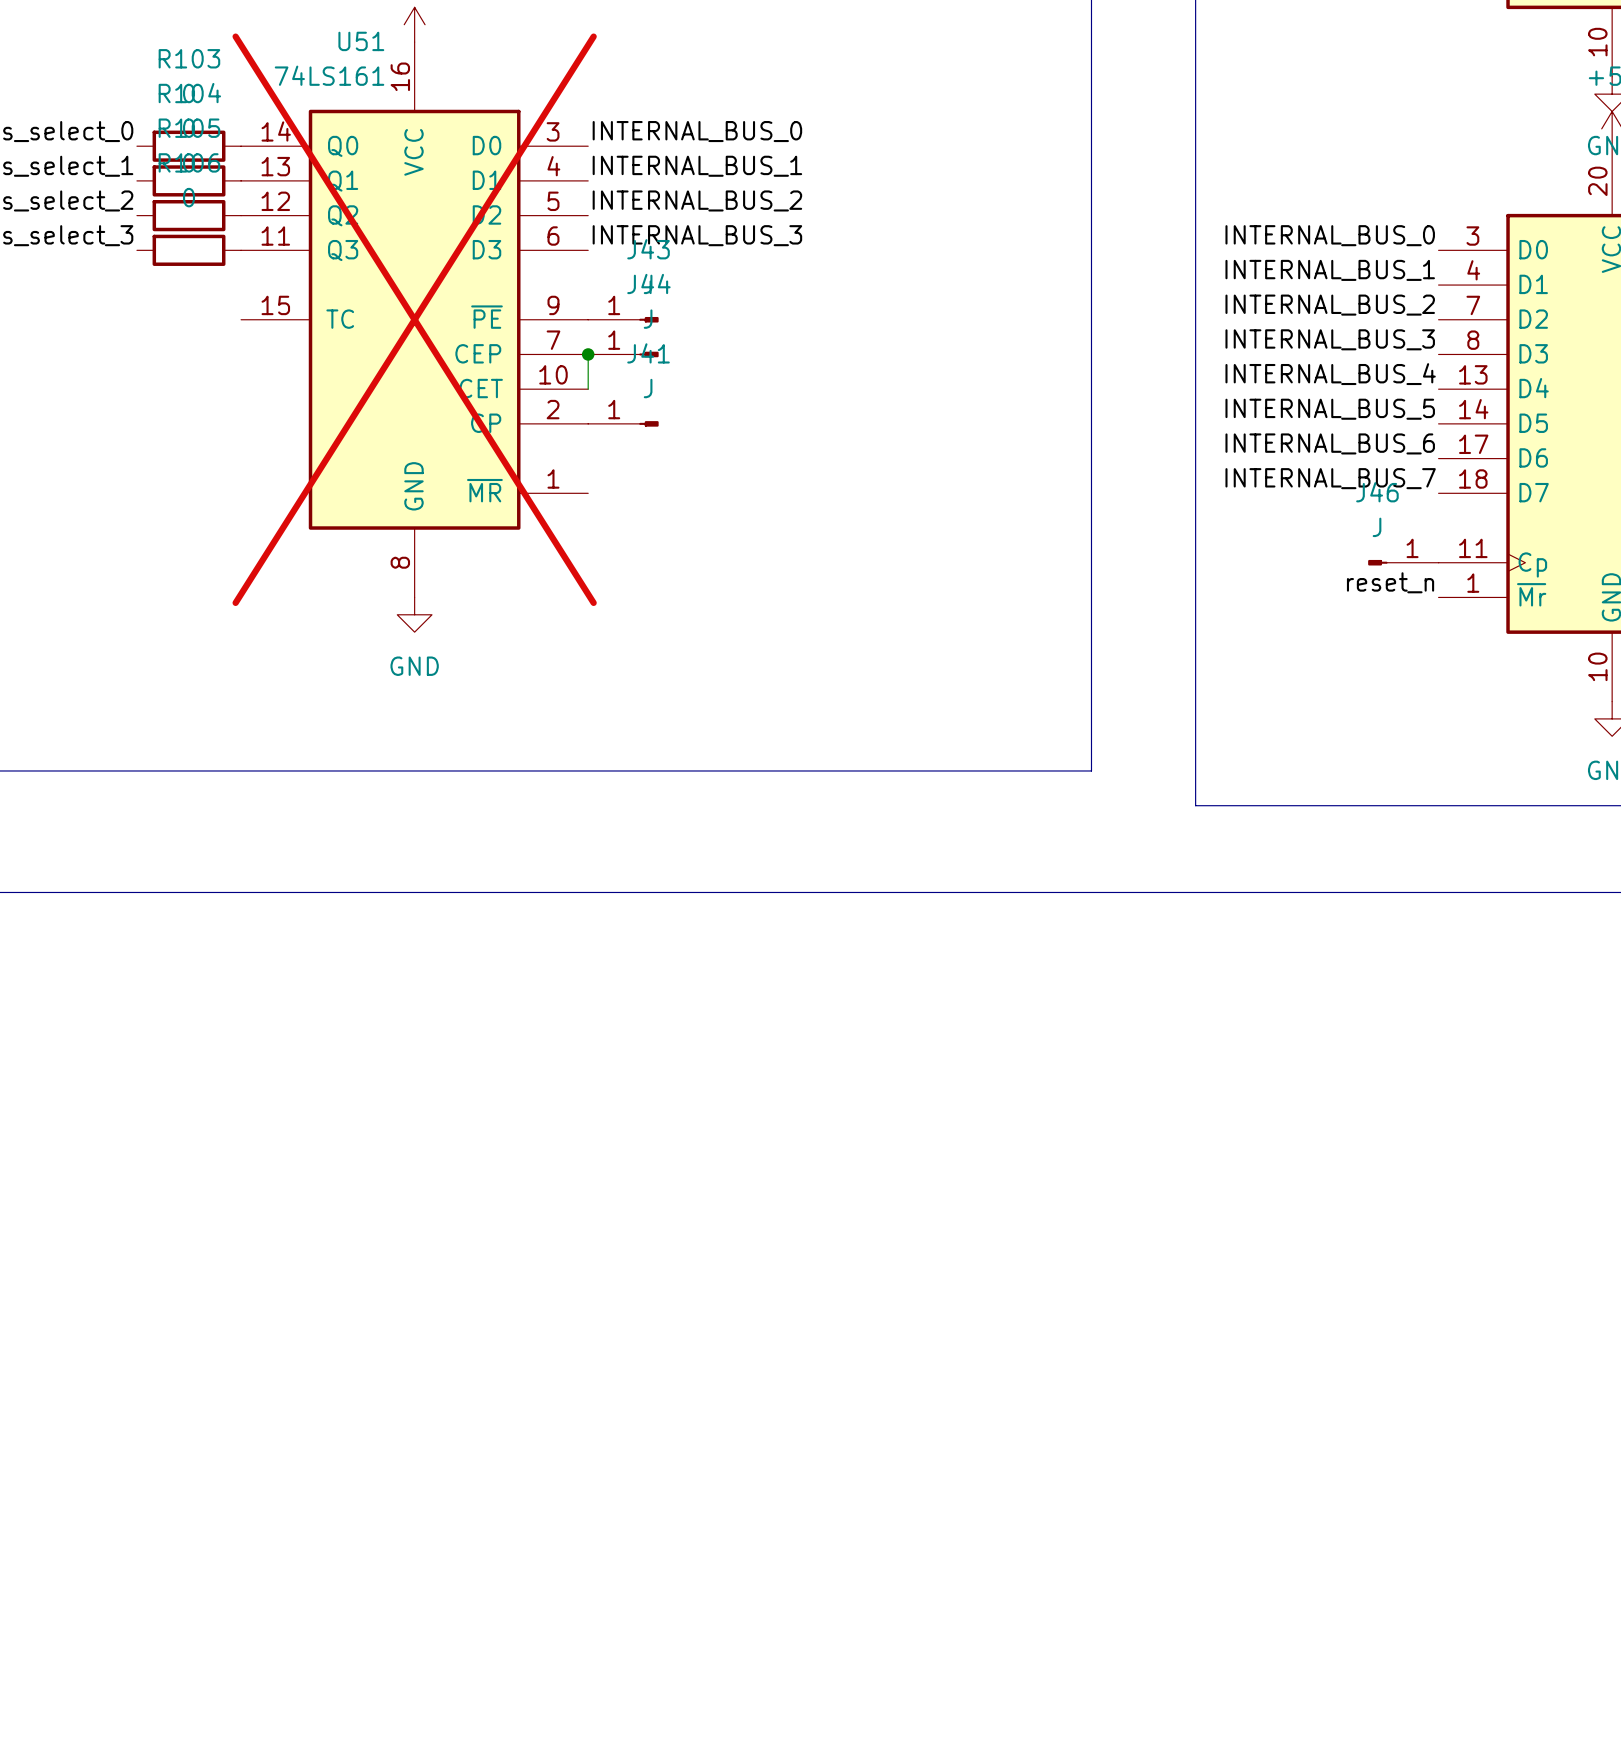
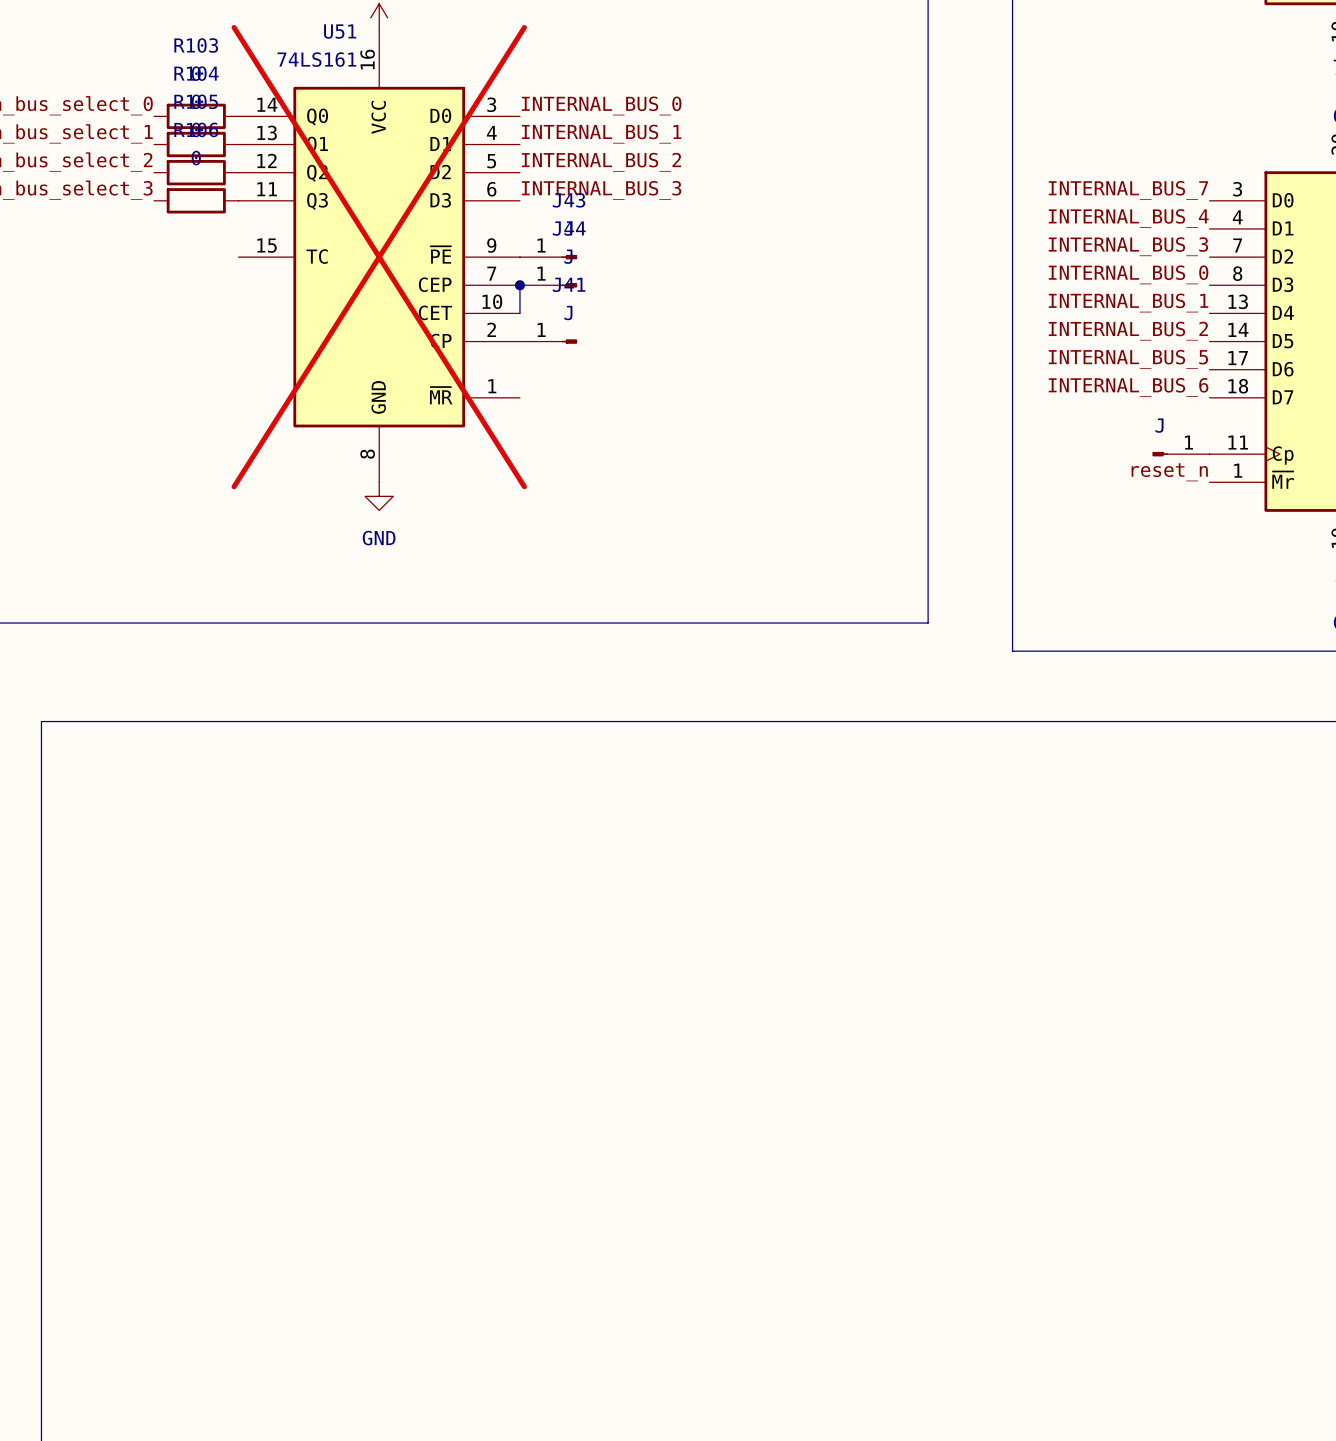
label: INTERNAL_BUS_0 (1330, 235) -> INTERNAL_BUS_7 (1128, 190)
label: INTERNAL_BUS_1 (1330, 270) -> INTERNAL_BUS_4 (1128, 218)
label: INTERNAL_BUS_2 (1330, 305) -> INTERNAL_BUS_3 (1128, 246)
label: INTERNAL_BUS_3 (1330, 339) -> INTERNAL_BUS_0 (1128, 274)
label: INTERNAL_BUS_4 (1330, 374) -> INTERNAL_BUS_1 (1128, 303)
label: INTERNAL_BUS_5 (1330, 409) -> INTERNAL_BUS_2 (1128, 331)
label: INTERNAL_BUS_6 (1330, 443) -> INTERNAL_BUS_5 (1128, 359)
label: INTERNAL_BUS_7 (1330, 478) -> INTERNAL_BUS_6 (1128, 387)
J46 name: J46 (1377, 492) -> none

